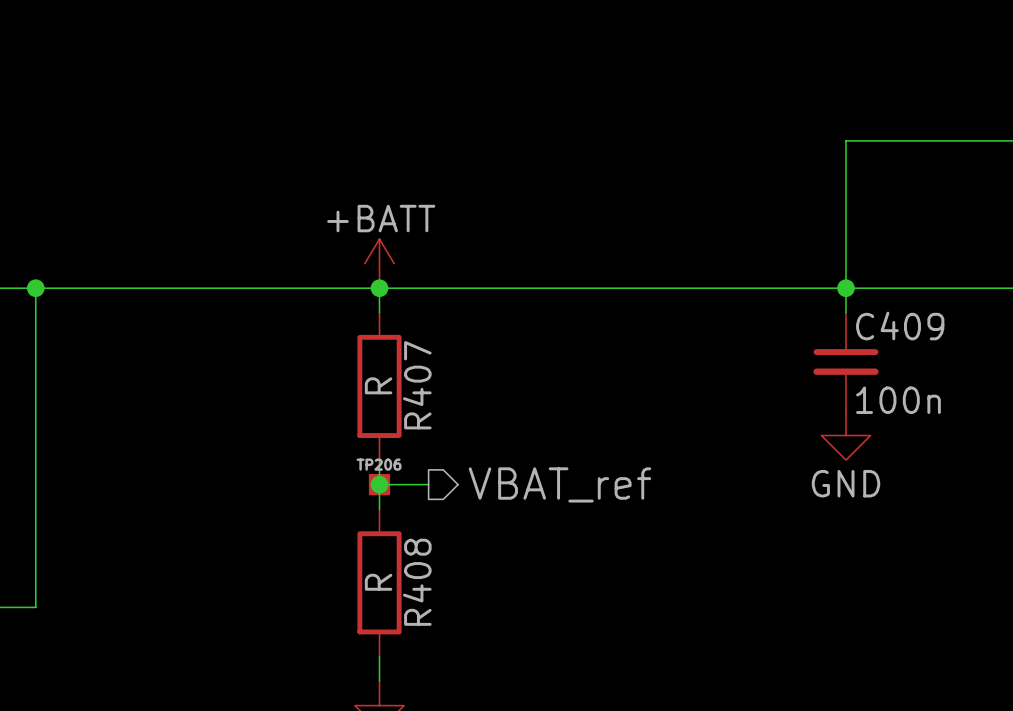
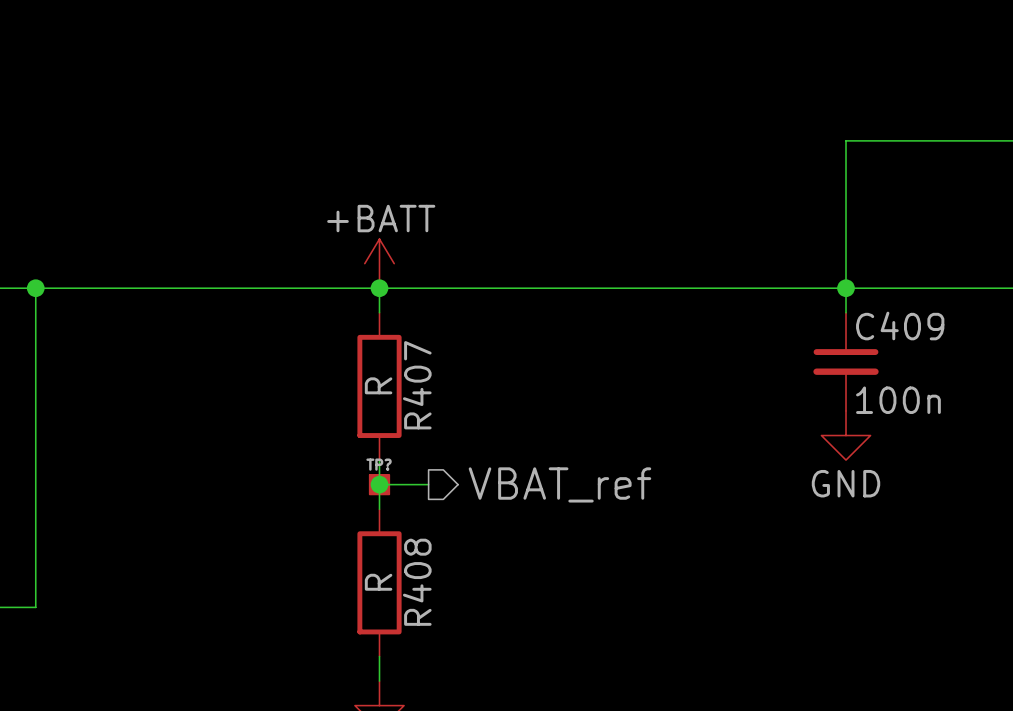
TP206 name: TP206 (379, 464) -> TP? (379, 464)

